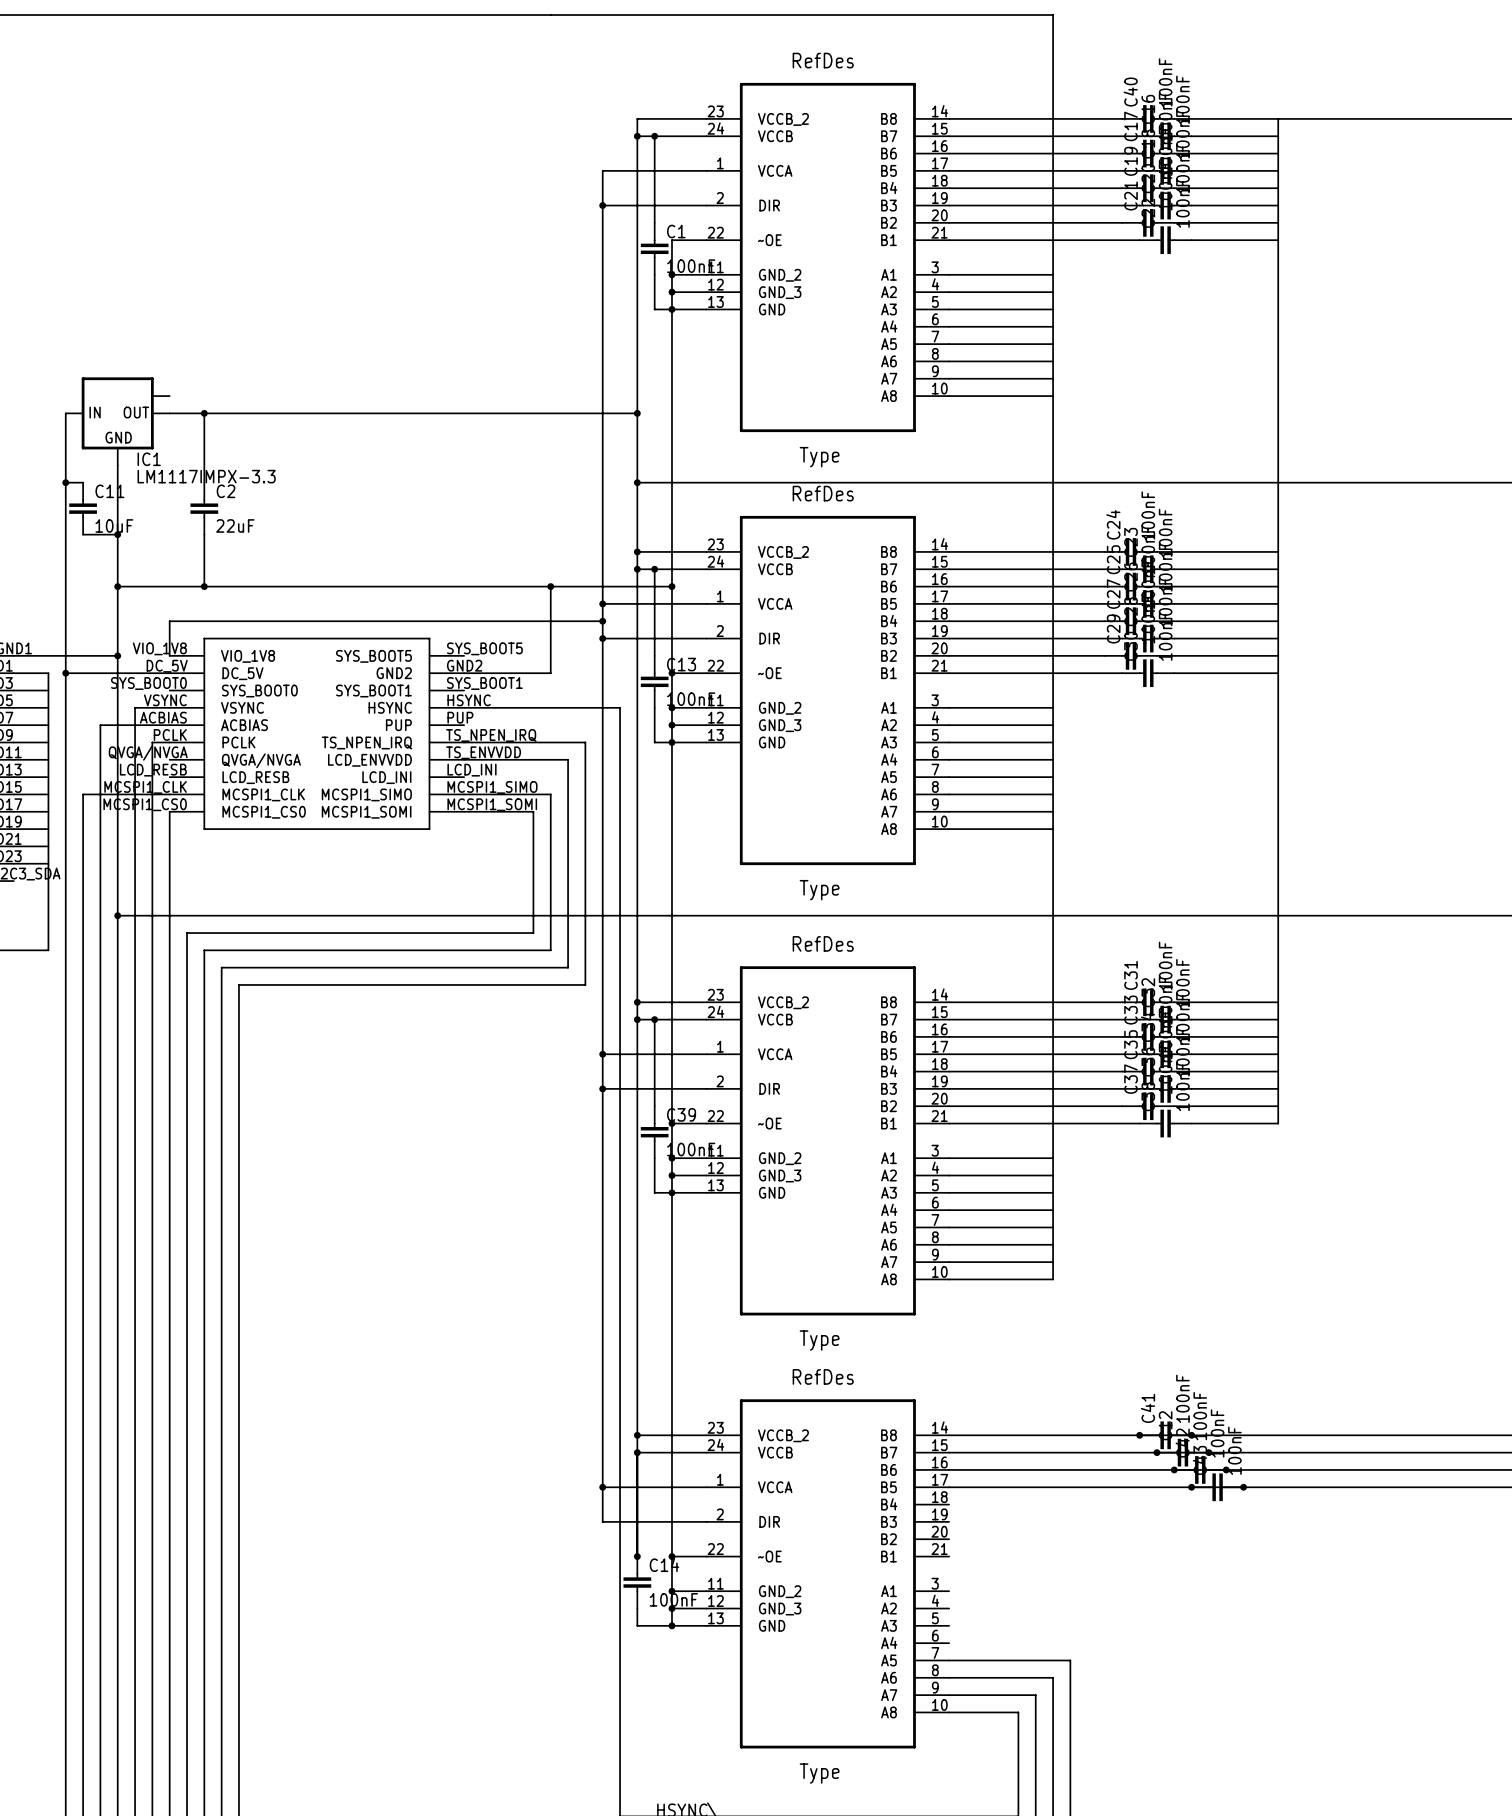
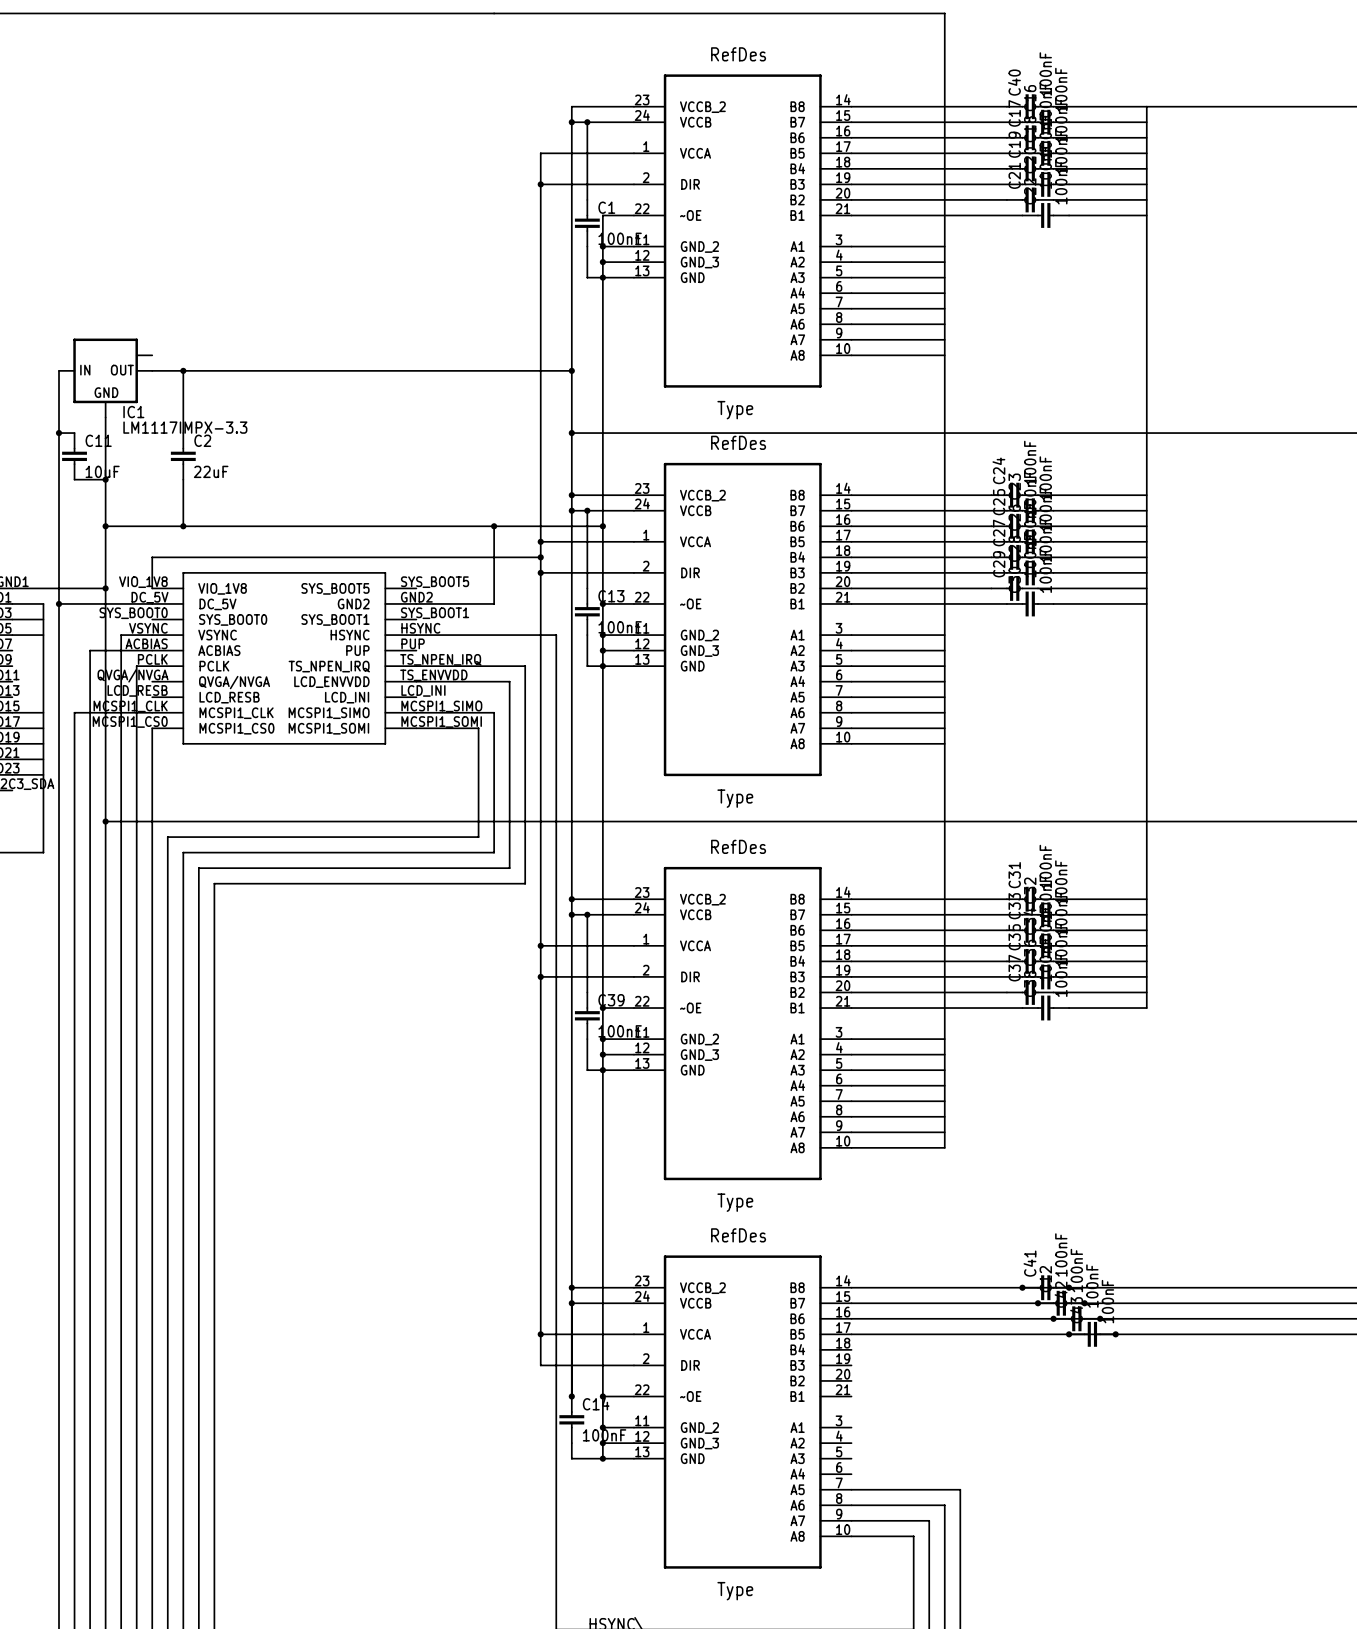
wire: (13, 725) (48, 725) -> none
wire: (13, 742) (48, 742) -> none
wire: (13, 759) (48, 759) -> none
wire: (13, 777) (48, 777) -> none

